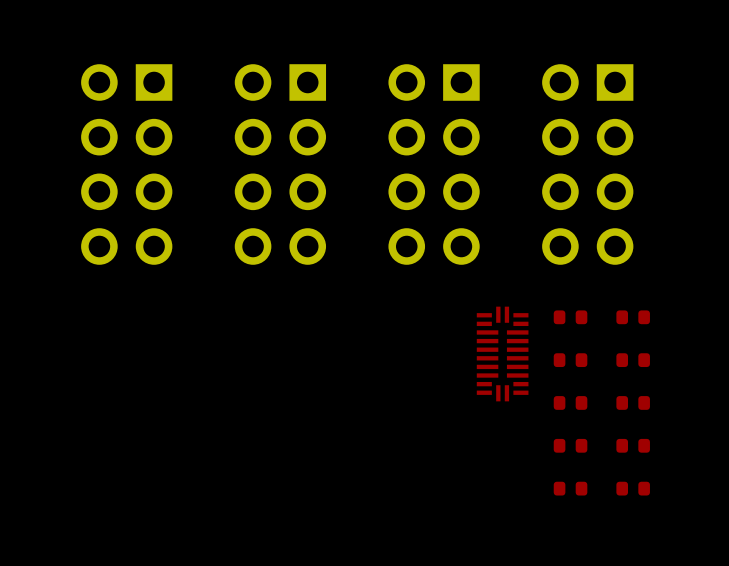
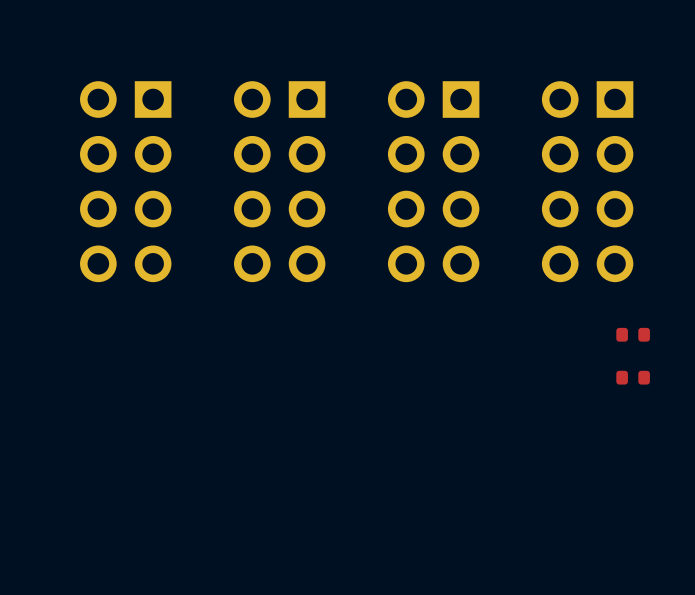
part: (570, 317) -> none
part: (502, 354) -> none
part: (570, 360) -> none
part: (570, 402) -> none
part: (633, 402) -> none
part: (570, 445) -> none
part: (633, 445) -> none
part: (570, 488) -> none
part: (633, 488) -> none

